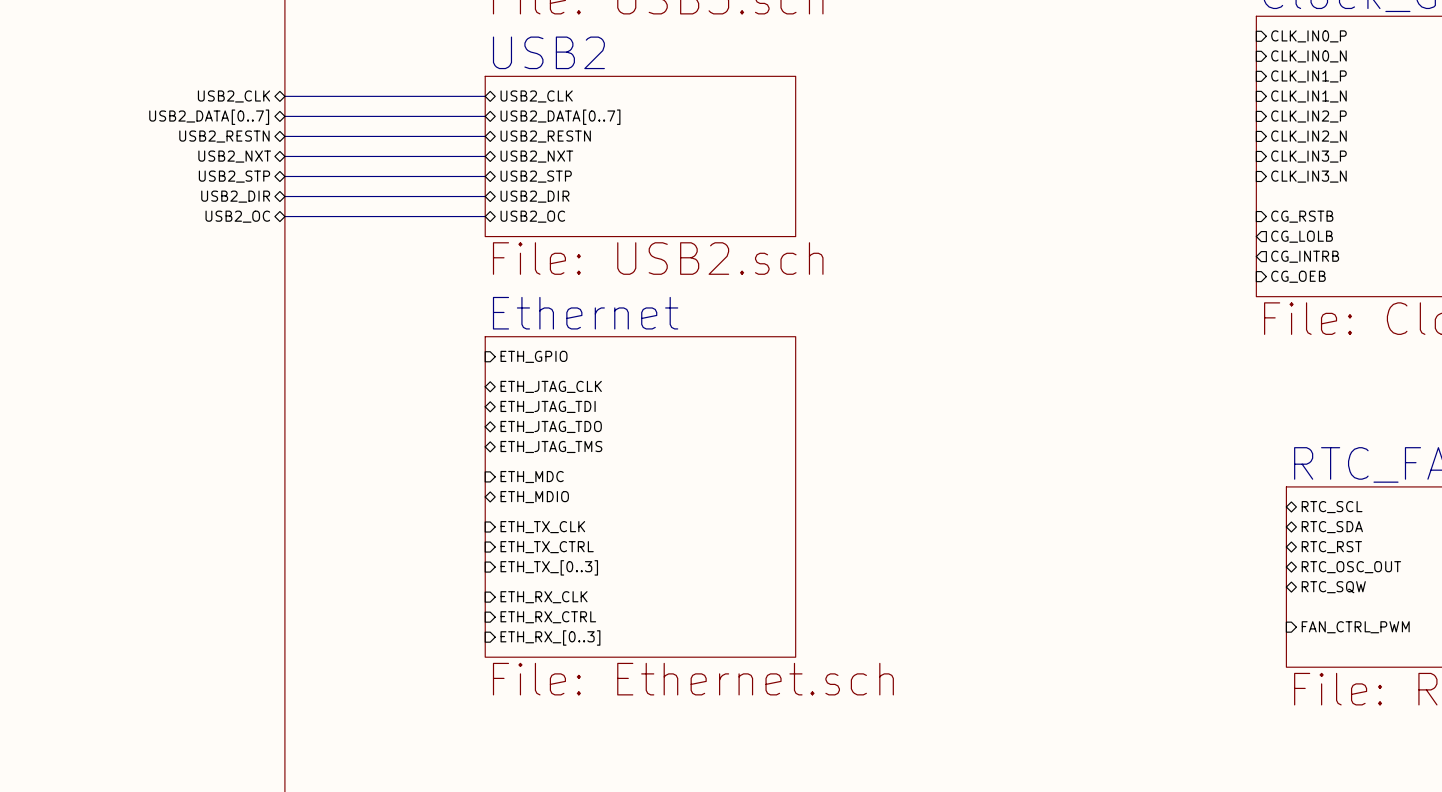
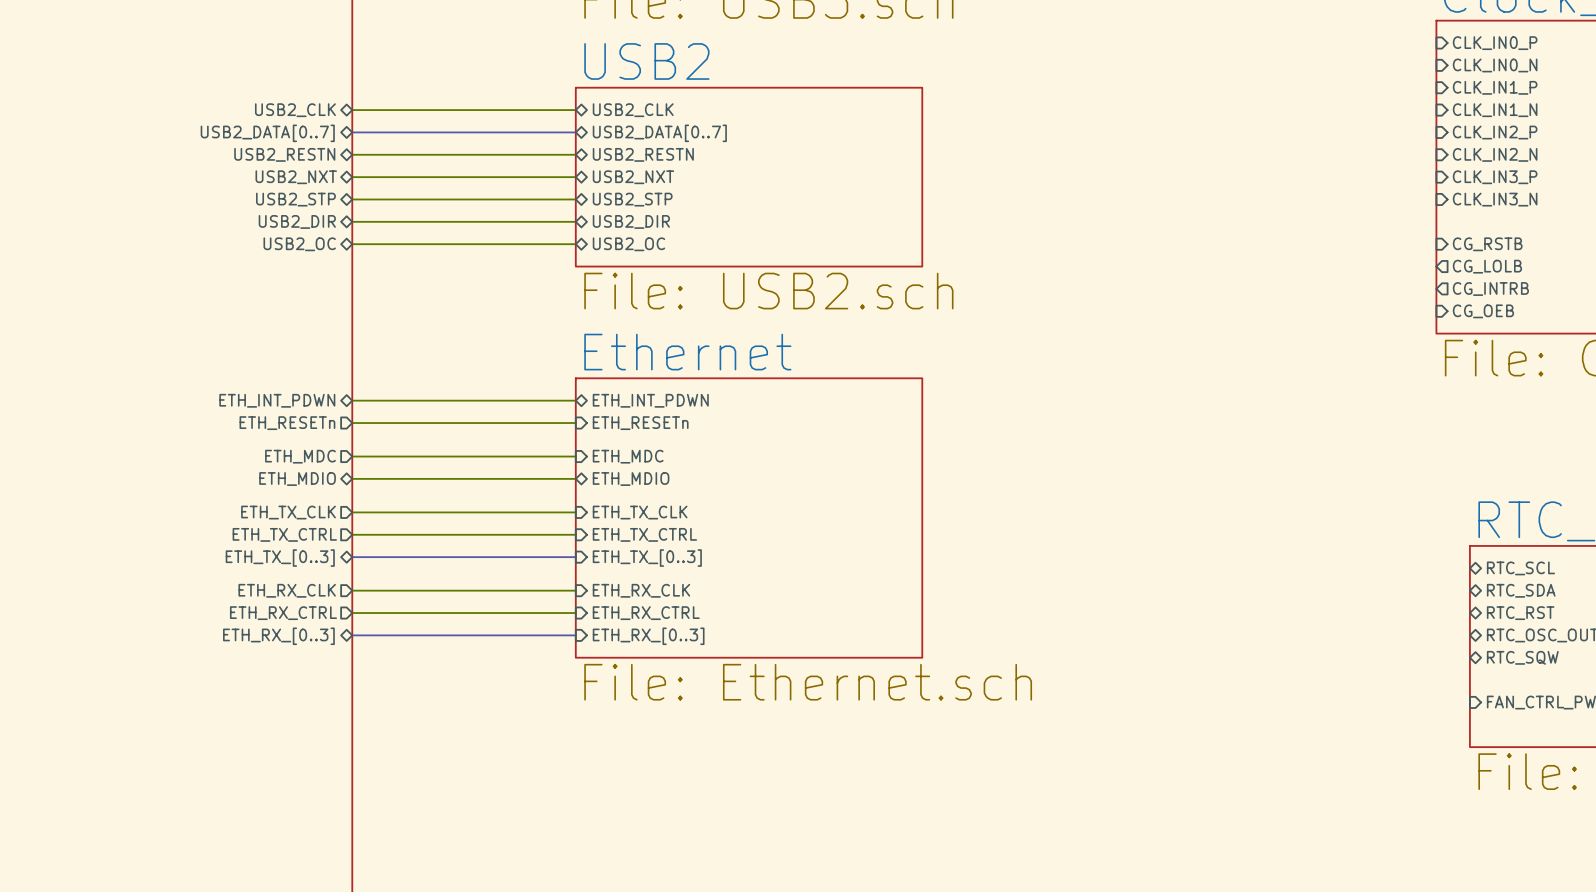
sheet pin: none -> ETH_INT_PDWN (277, 400)
wire: none -> (352, 400) (575, 400)
sheet pin shape: input (534, 356) -> bidirectional (650, 400)
sheet pin: ETH_GPIO (534, 356) -> ETH_INT_PDWN (650, 400)
sheet pin: none -> ETH_RESETn (287, 423)
wire: none -> (352, 423) (575, 423)
sheet pin: none -> ETH_RESETn (640, 423)
sheet pin: ETH_JTAG_CLK (551, 386) -> none
sheet pin: none -> ETH_MDC (300, 456)
wire: none -> (352, 456) (575, 456)
sheet pin shape: bidirectional (548, 406) -> input (628, 456)
sheet pin: ETH_JTAG_TDI (548, 406) -> ETH_MDC (628, 456)
sheet pin: none -> ETH_MDIO (297, 479)
wire: none -> (352, 478) (575, 478)
sheet pin: ETH_JTAG_TDO (551, 426) -> ETH_MDIO (631, 479)
sheet pin: ETH_JTAG_TMS (551, 446) -> none
wire: none -> (352, 512) (575, 512)
sheet pin: none -> ETH_TX_CLK (288, 512)
sheet pin: none -> ETH_TX_CLK (640, 512)
sheet Ethernet: none -> File: Ethernet.sch (749, 518)
wire: none -> (352, 534) (575, 534)
sheet pin: none -> ETH_TX_CTRL (284, 534)
sheet pin: ETH_MDC (532, 477) -> ETH_TX_CTRL (644, 534)
bus: none -> (352, 557) (575, 557)
sheet Ethernet: File: Ethernet.sch (640, 496) -> none
sheet pin: none -> ETH_TX_[0..3] (280, 558)
sheet pin shape: bidirectional (534, 497) -> input (647, 558)
sheet pin: ETH_MDIO (534, 497) -> ETH_TX_[0..3] (647, 558)
sheet pin: none -> ETH_RX_CLK (287, 590)
wire: none -> (352, 590) (575, 590)
sheet pin: ETH_TX_CLK (542, 527) -> ETH_RX_CLK (641, 590)
sheet pin: none -> ETH_RX_CTRL (283, 613)
wire: none -> (352, 613) (575, 613)
sheet pin: ETH_TX_CTRL (547, 547) -> ETH_RX_CTRL (646, 613)
sheet pin: none -> ETH_RX_[0..3] (278, 636)
bus: none -> (352, 635) (575, 635)
sheet pin: ETH_TX_[0..3] (549, 567) -> ETH_RX_[0..3] (648, 636)
sheet pin: ETH_RX_CLK (544, 597) -> none
sheet pin: ETH_RX_CTRL (548, 617) -> none
sheet pin: ETH_RX_[0..3] (550, 637) -> none

